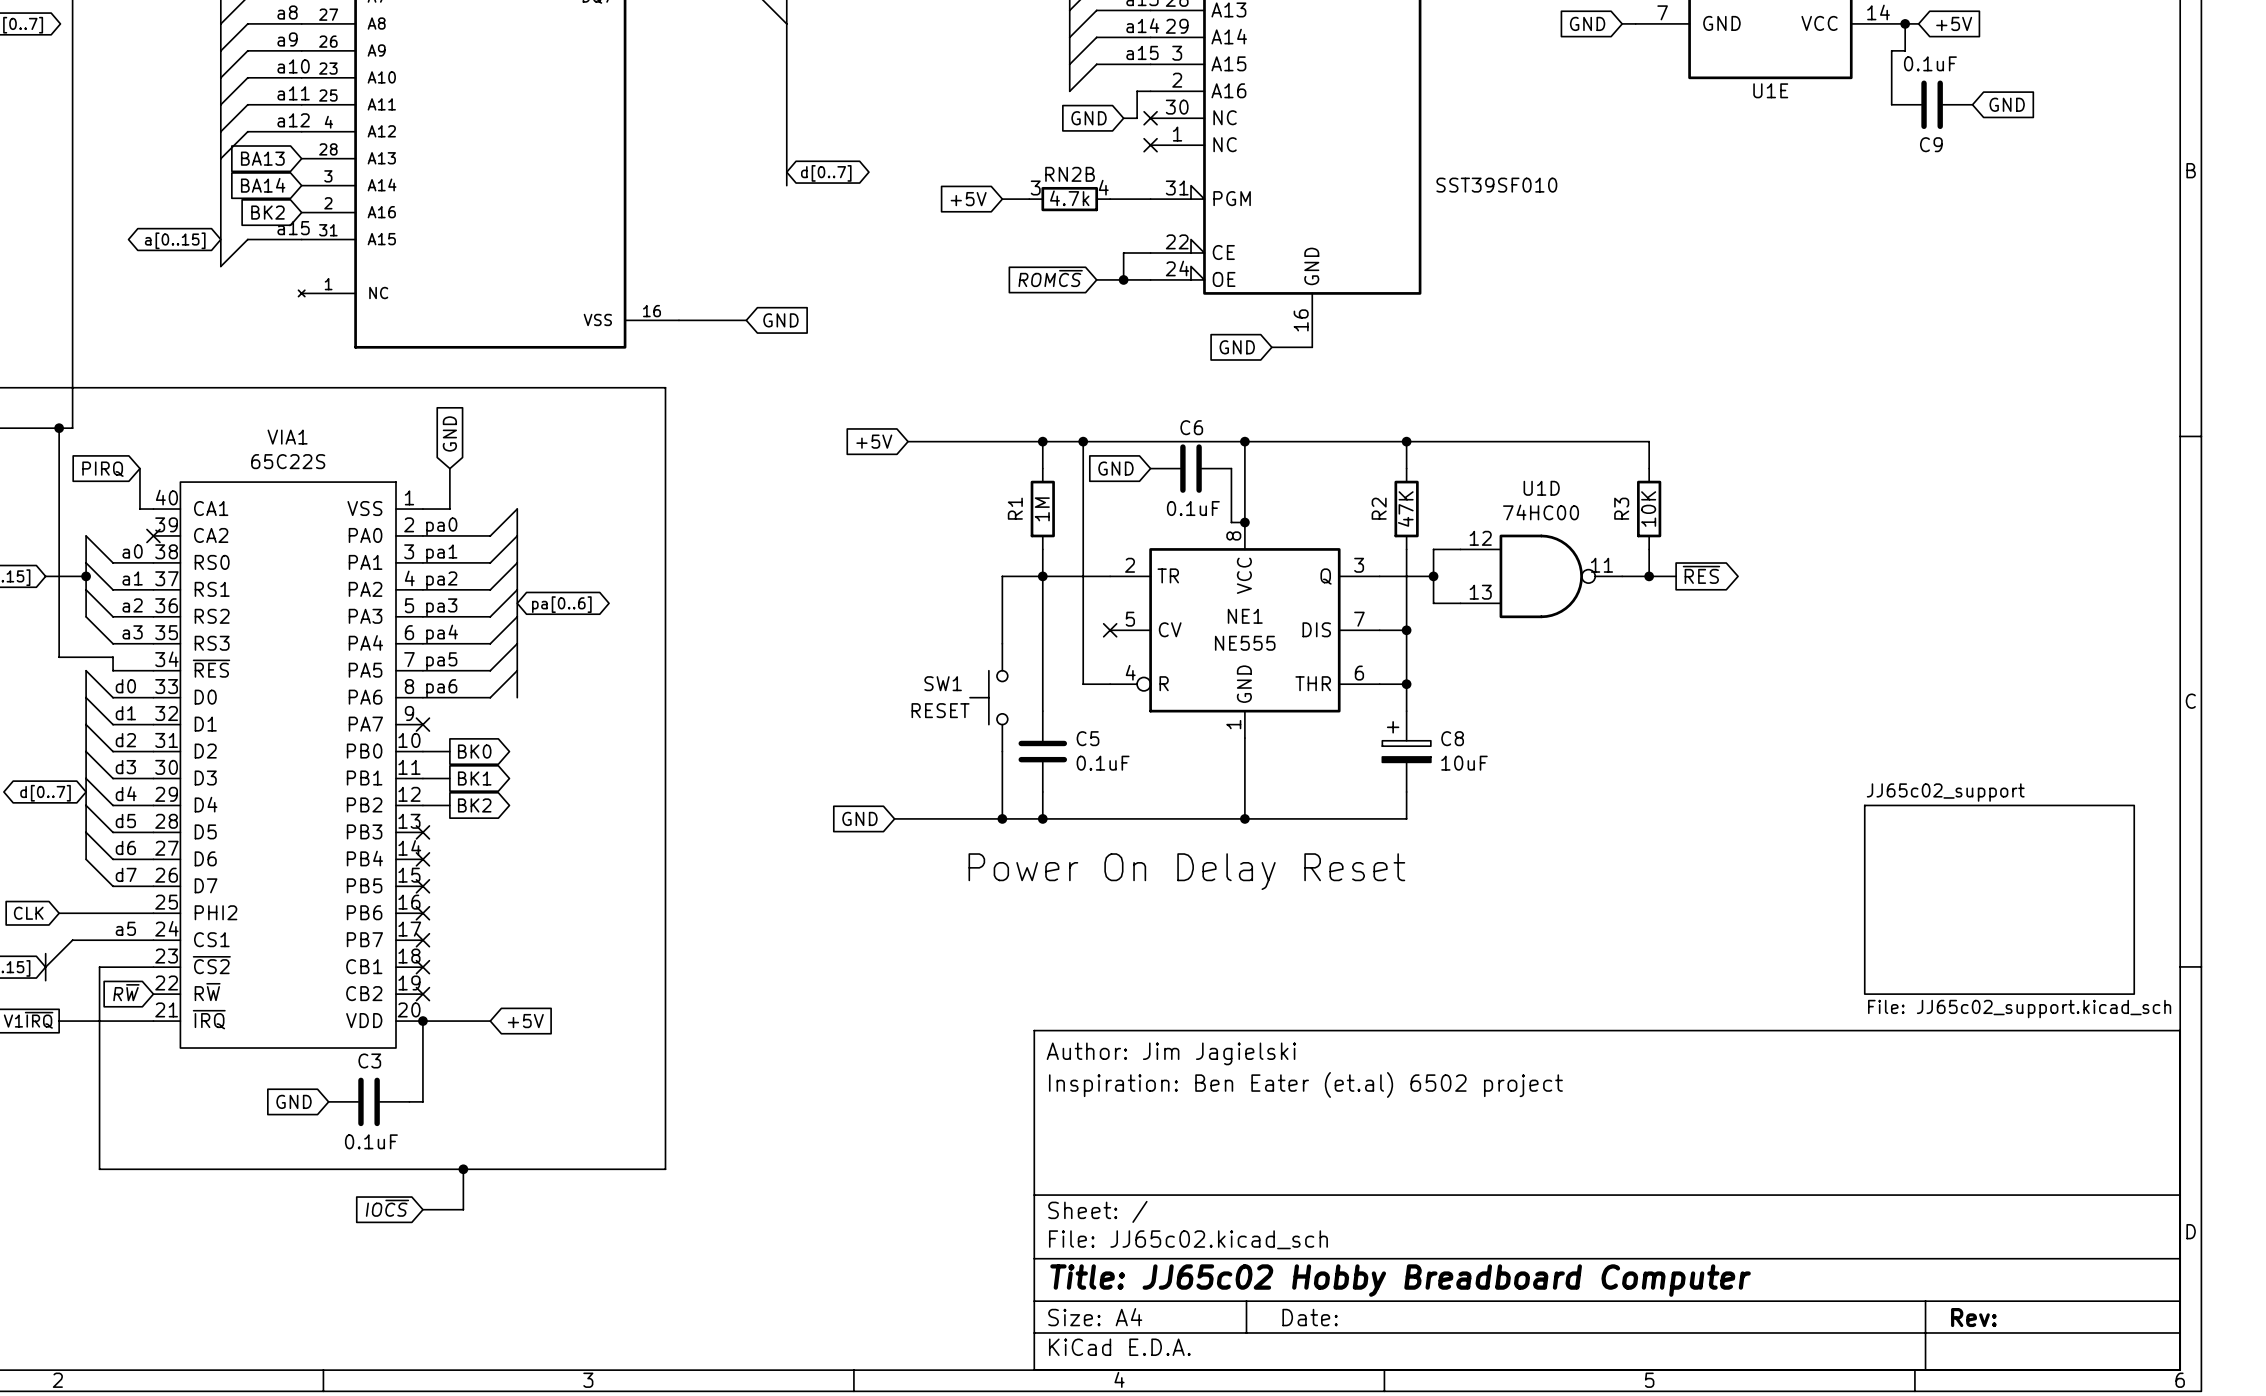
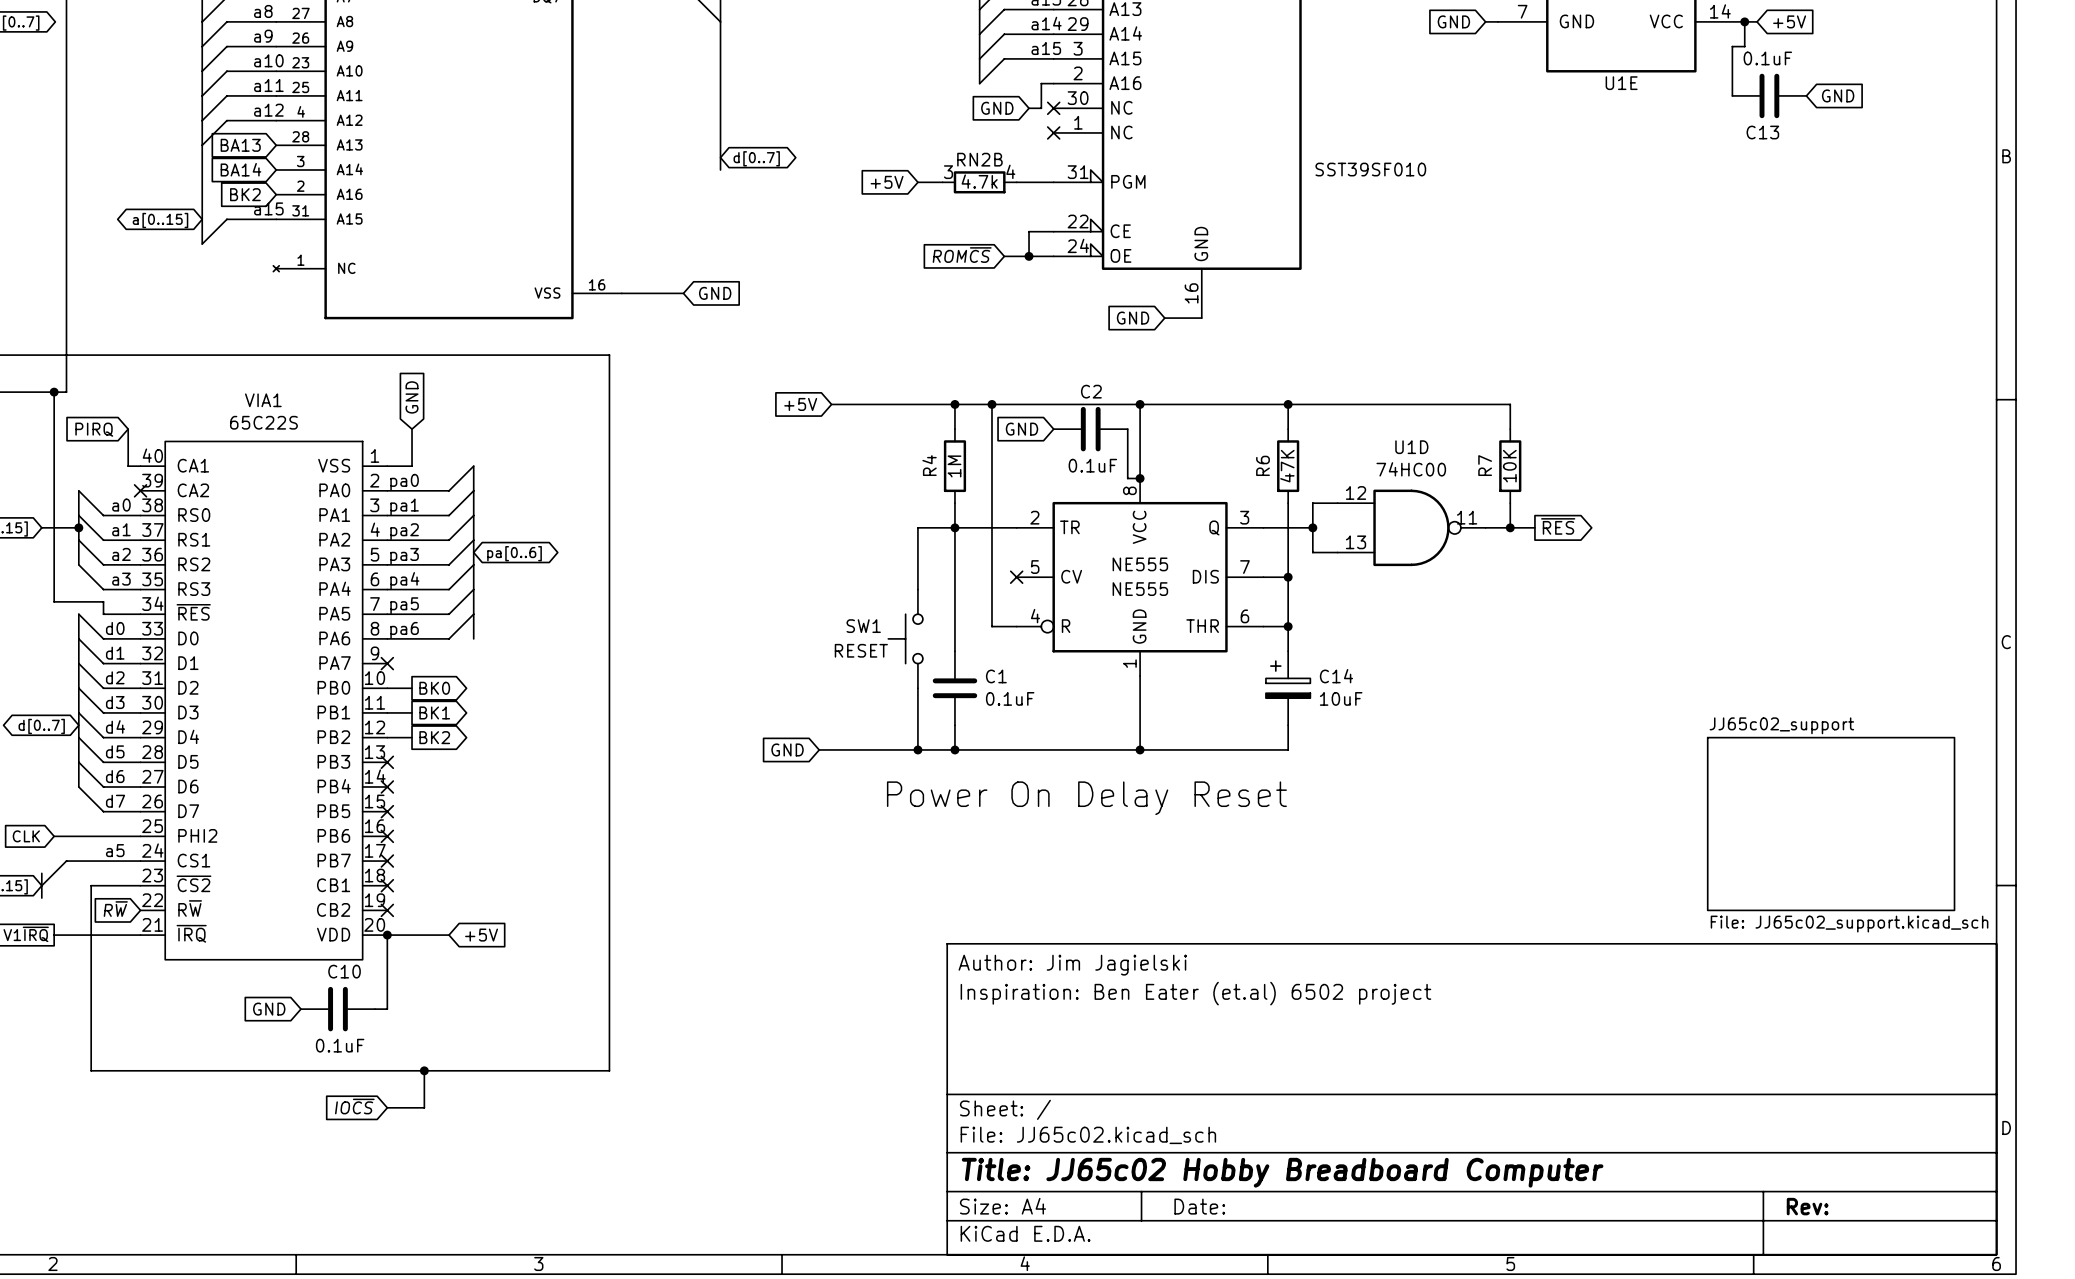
C9 name: C9 (1931, 144) -> C13 (1762, 132)
C6 name: C6 (1191, 427) -> C2 (1091, 391)
R1 name: R1 (1015, 508) -> R4 (929, 465)
R2 name: R2 (1379, 508) -> R6 (1263, 465)
R3 name: R3 (1621, 508) -> R7 (1485, 465)
NE1 name: NE1 (1245, 616) -> NE555 (1140, 564)
C5 name: C5 (1087, 738) -> C1 (996, 676)
C8 name: C8 (1452, 738) -> C14 (1336, 676)
C3 name: C3 (369, 1060) -> C10 (344, 971)

